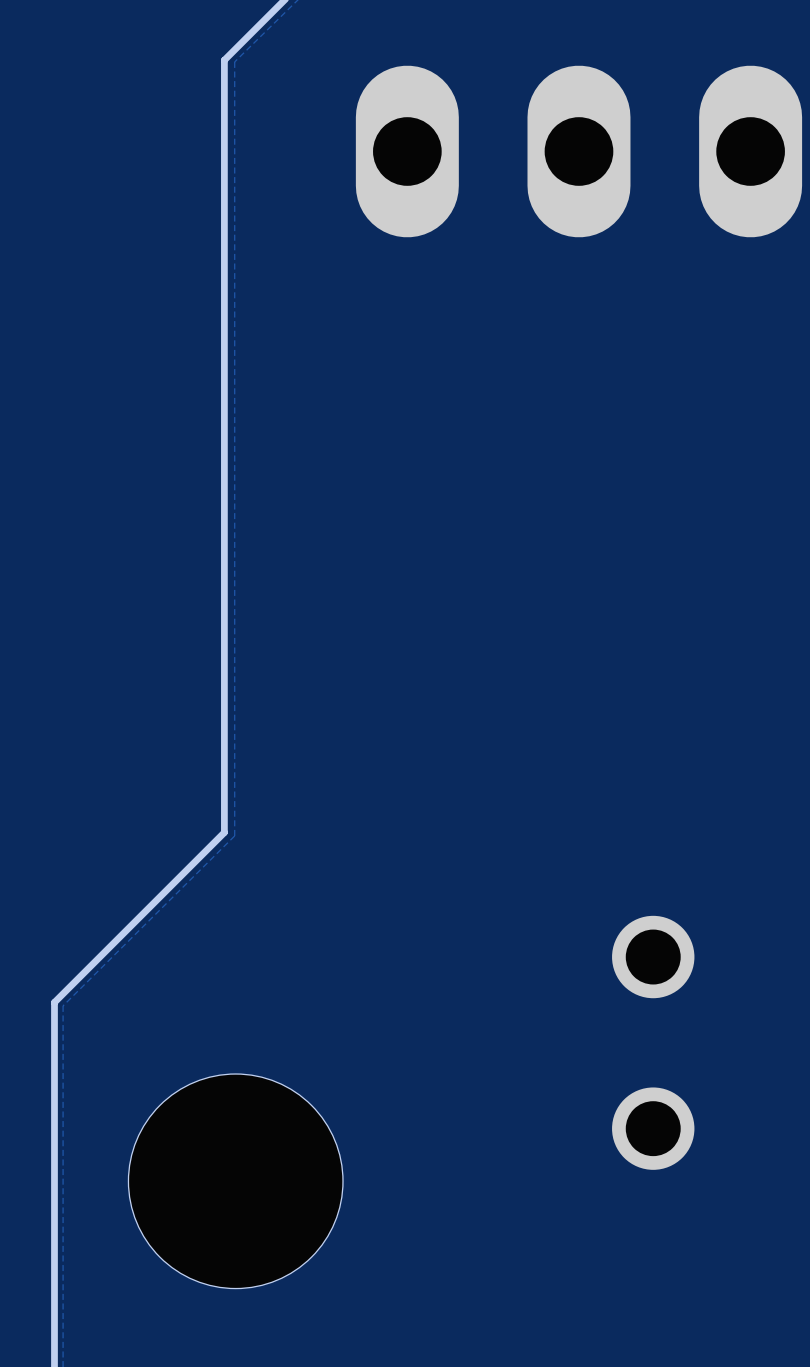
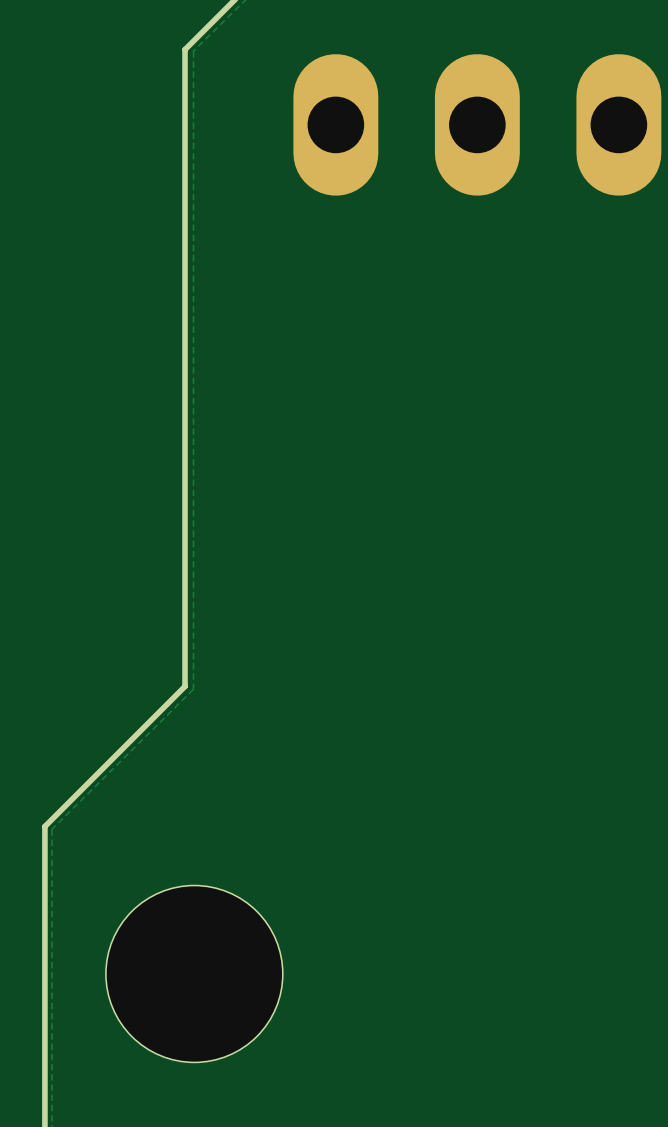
part: (653, 1042) -> none

